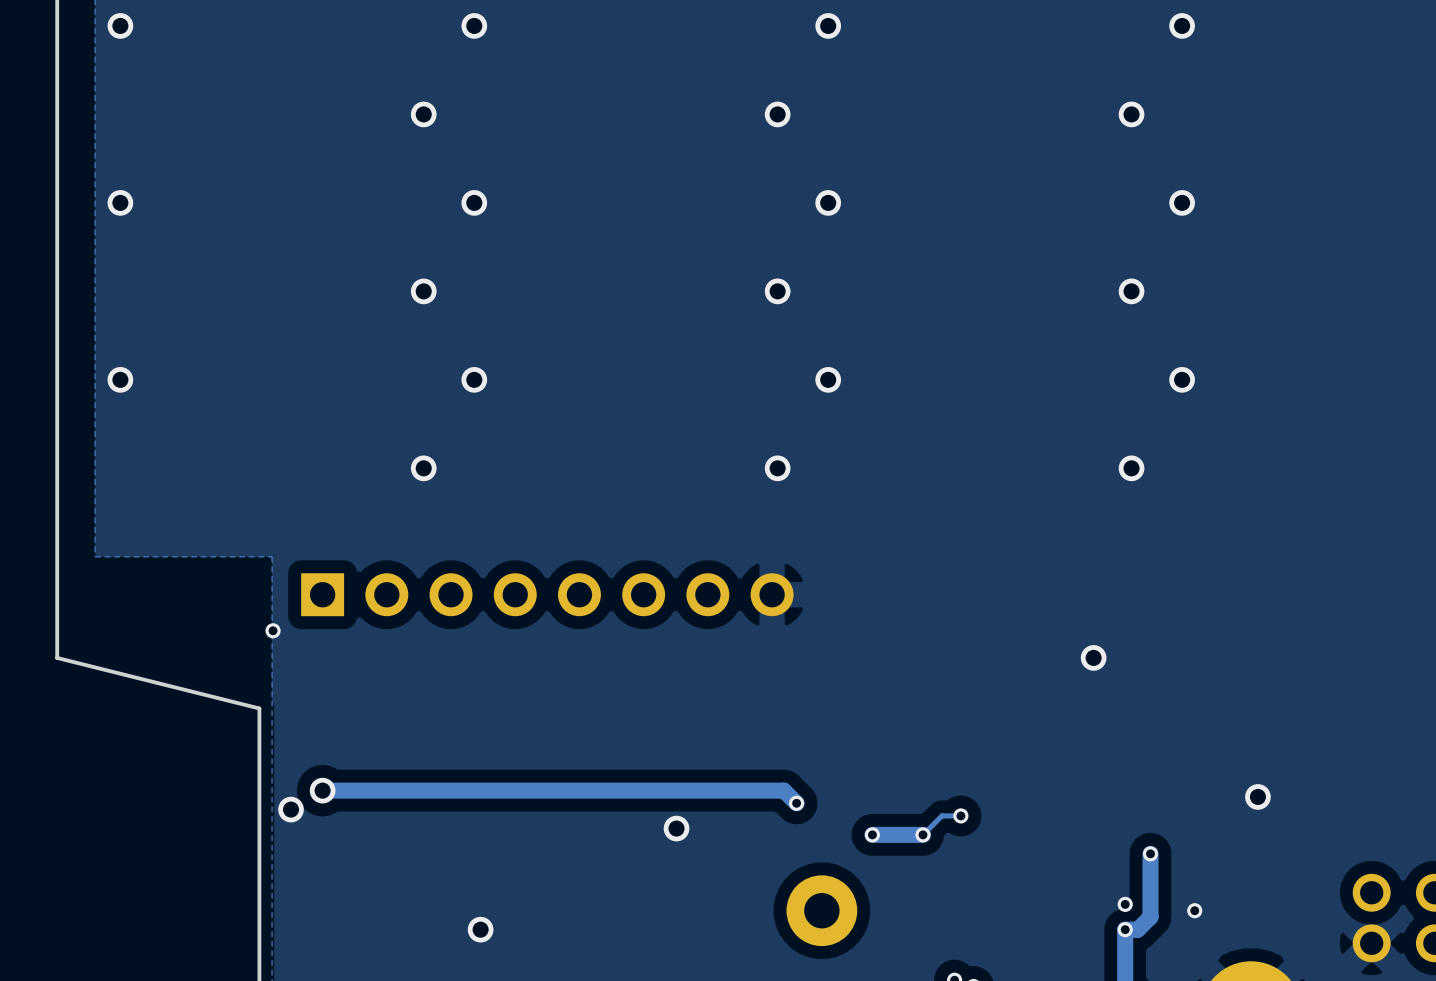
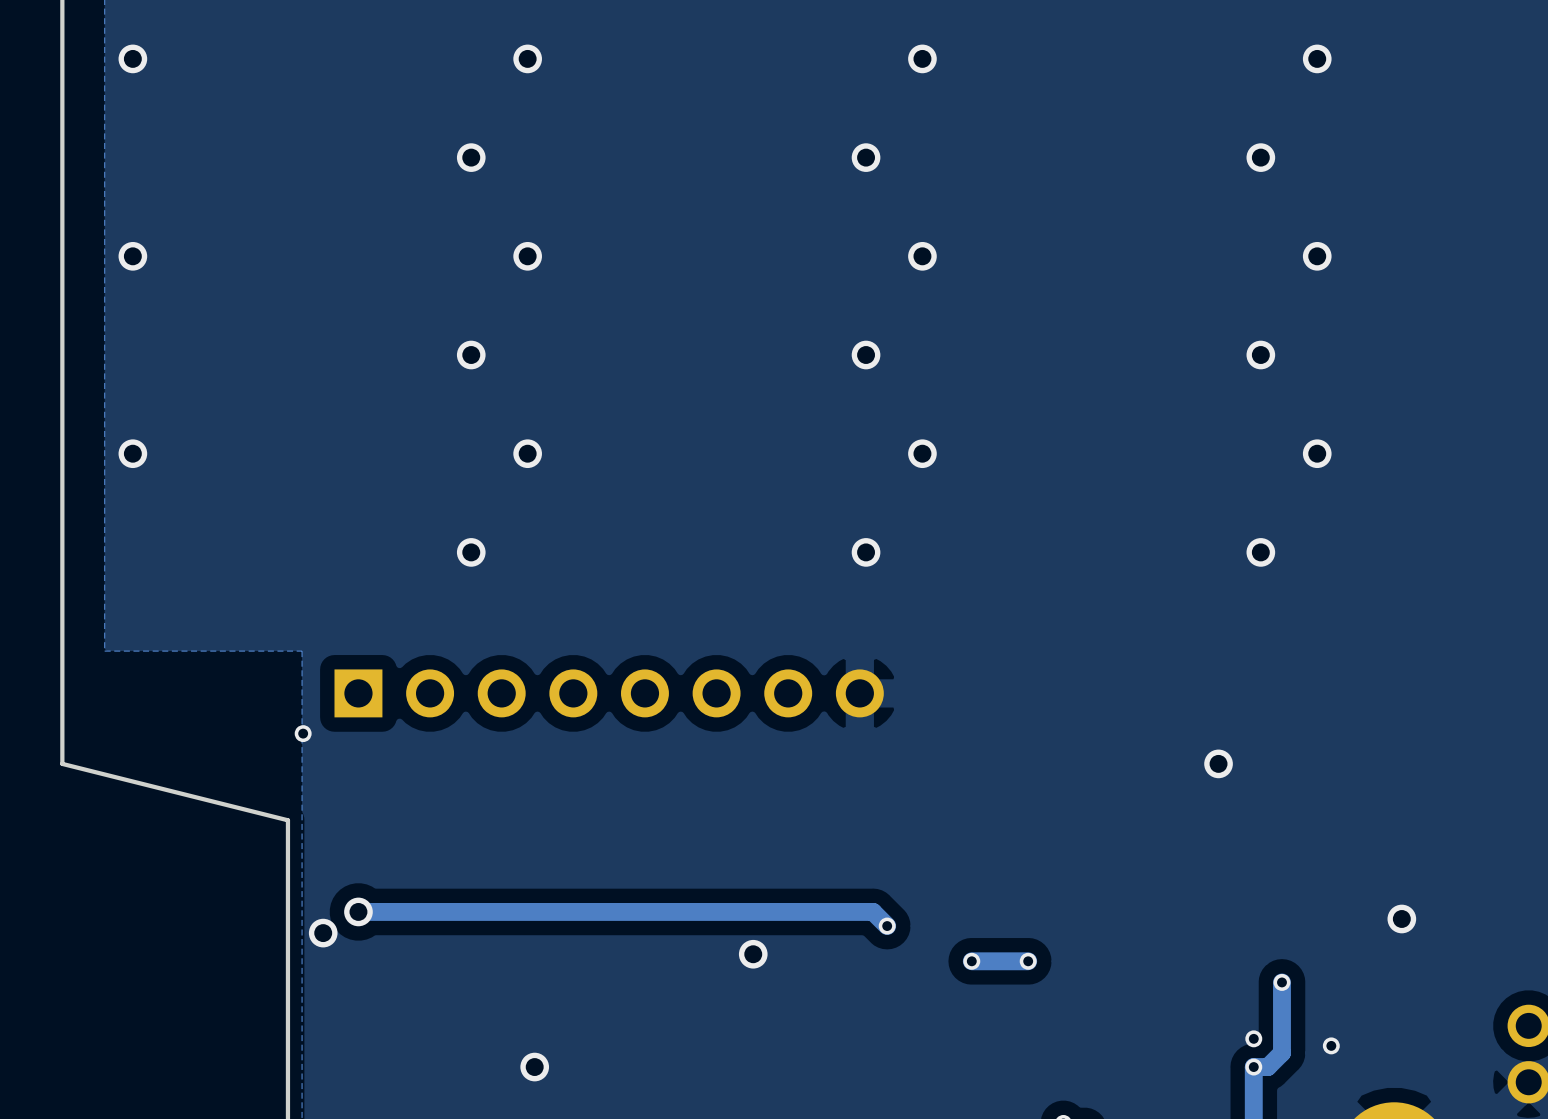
track: (960, 815) (941, 815) (922, 834) -> none
via: (960, 815) -> none
part: (821, 910) -> none

